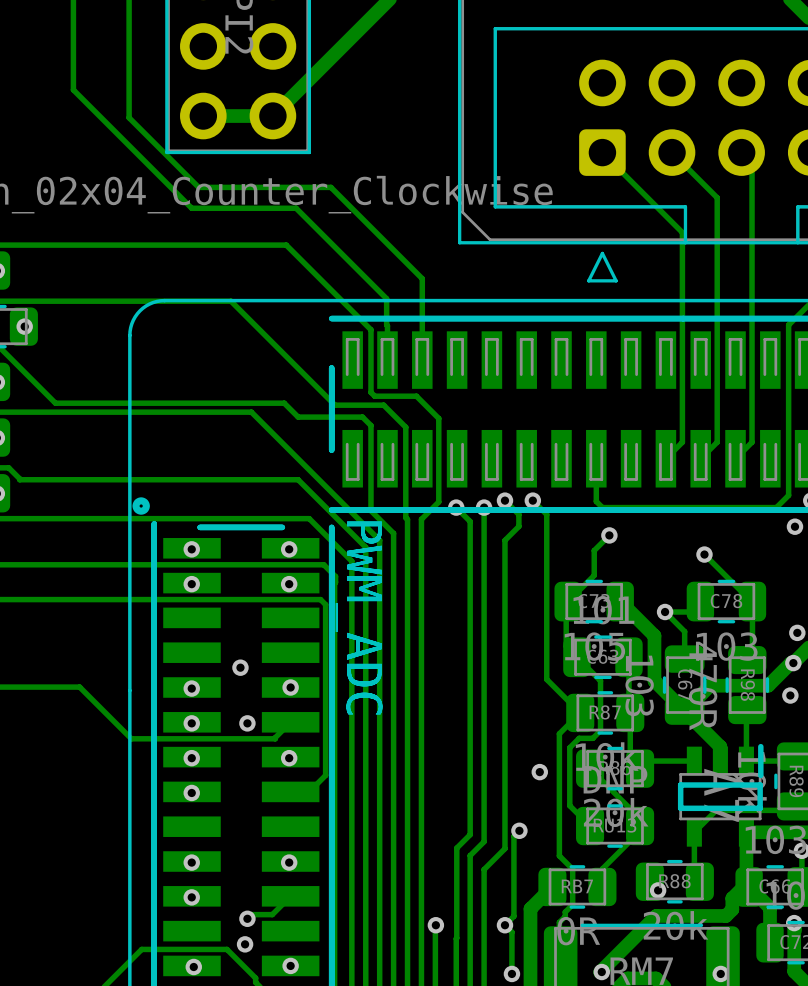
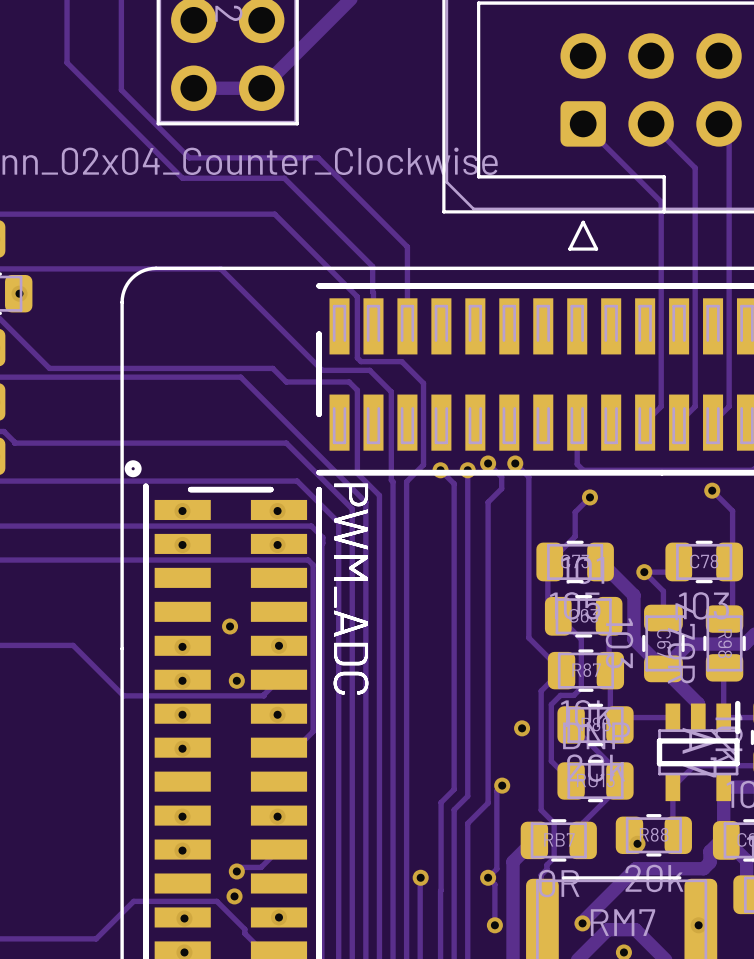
track: none -> (712, 490) (732, 511) (732, 611)
track: (704, 554) (752, 601) (752, 654) -> none
via position: (704, 554) -> (712, 490)

